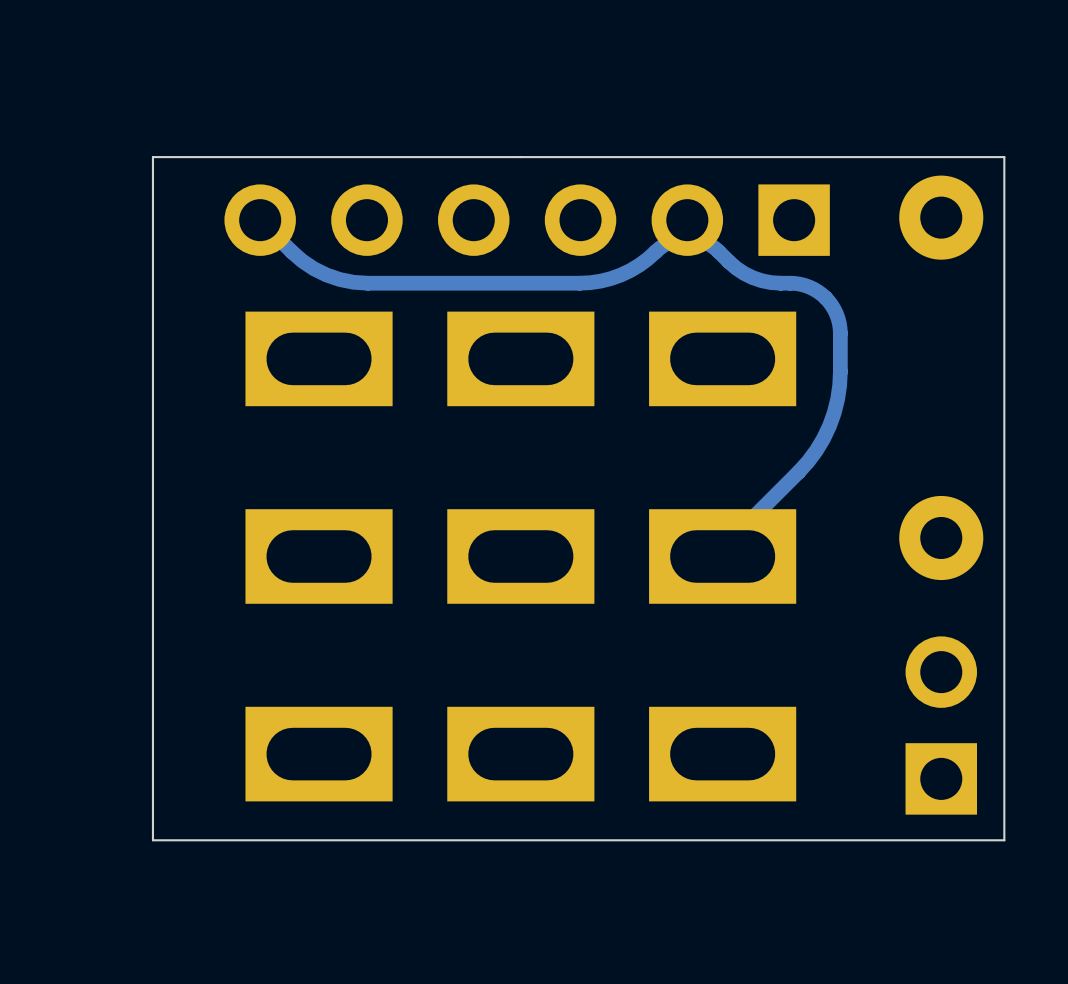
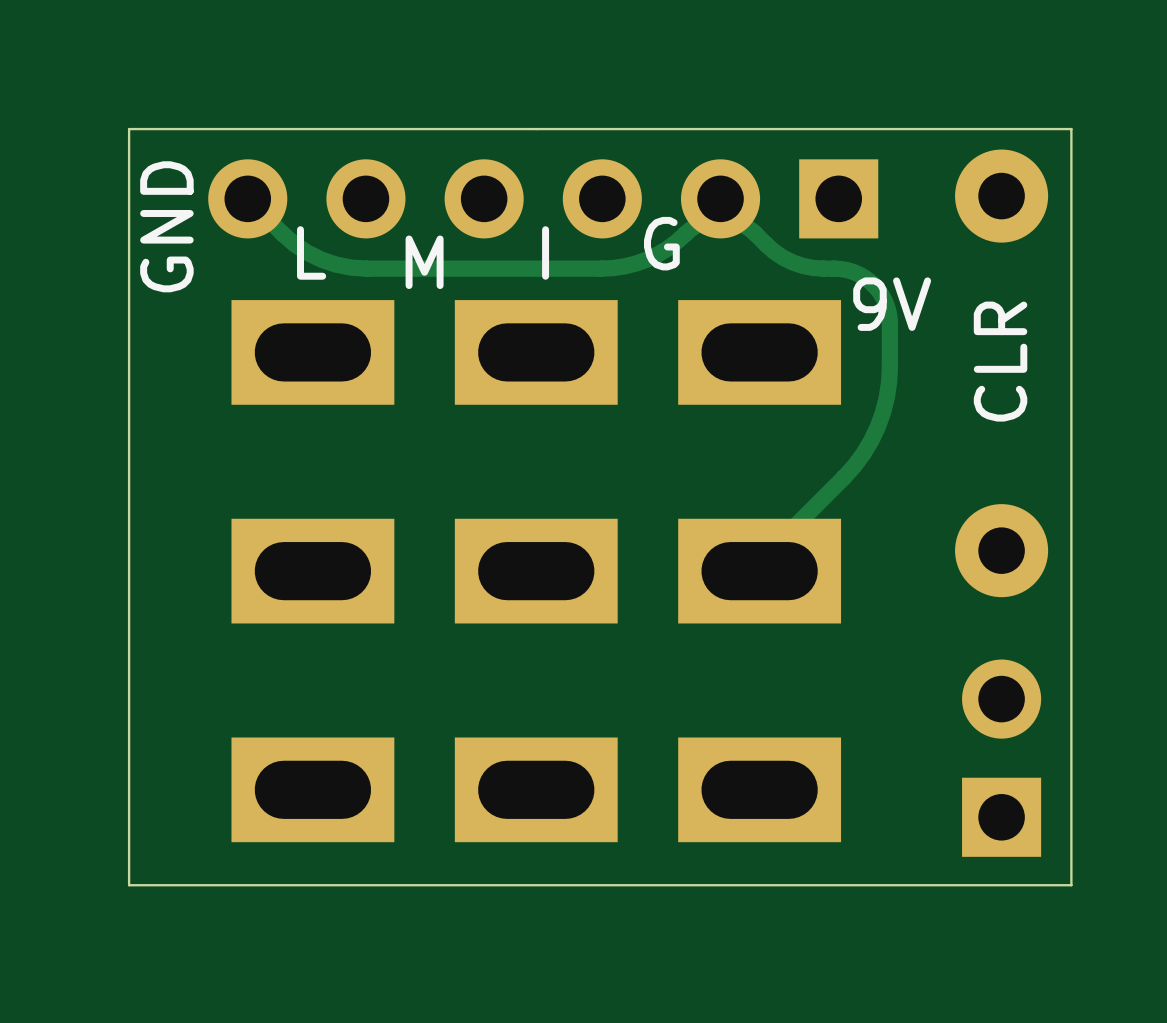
text: none -> GND (166, 226)
text: none -> G (661, 243)
text: none -> L (311, 252)
text: none -> I (545, 252)
text: none -> M (424, 262)
text: none -> 9V (892, 304)
text: none -> CLR (1000, 361)

